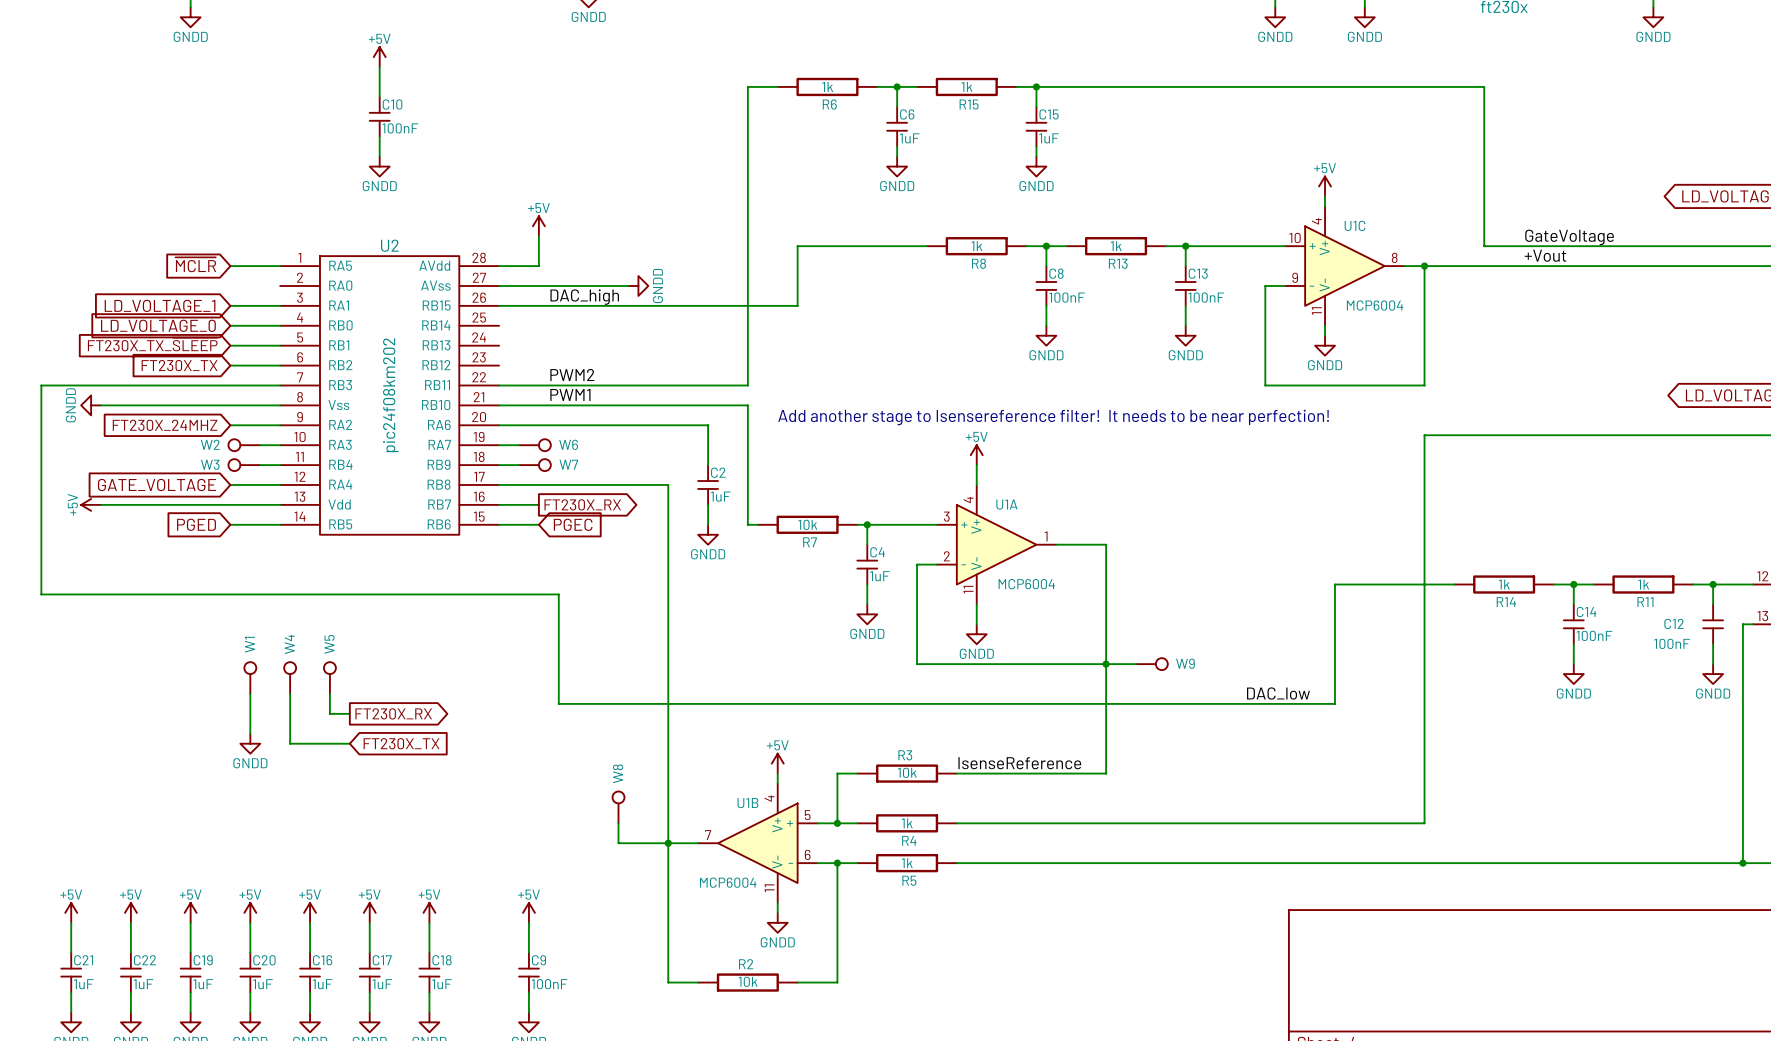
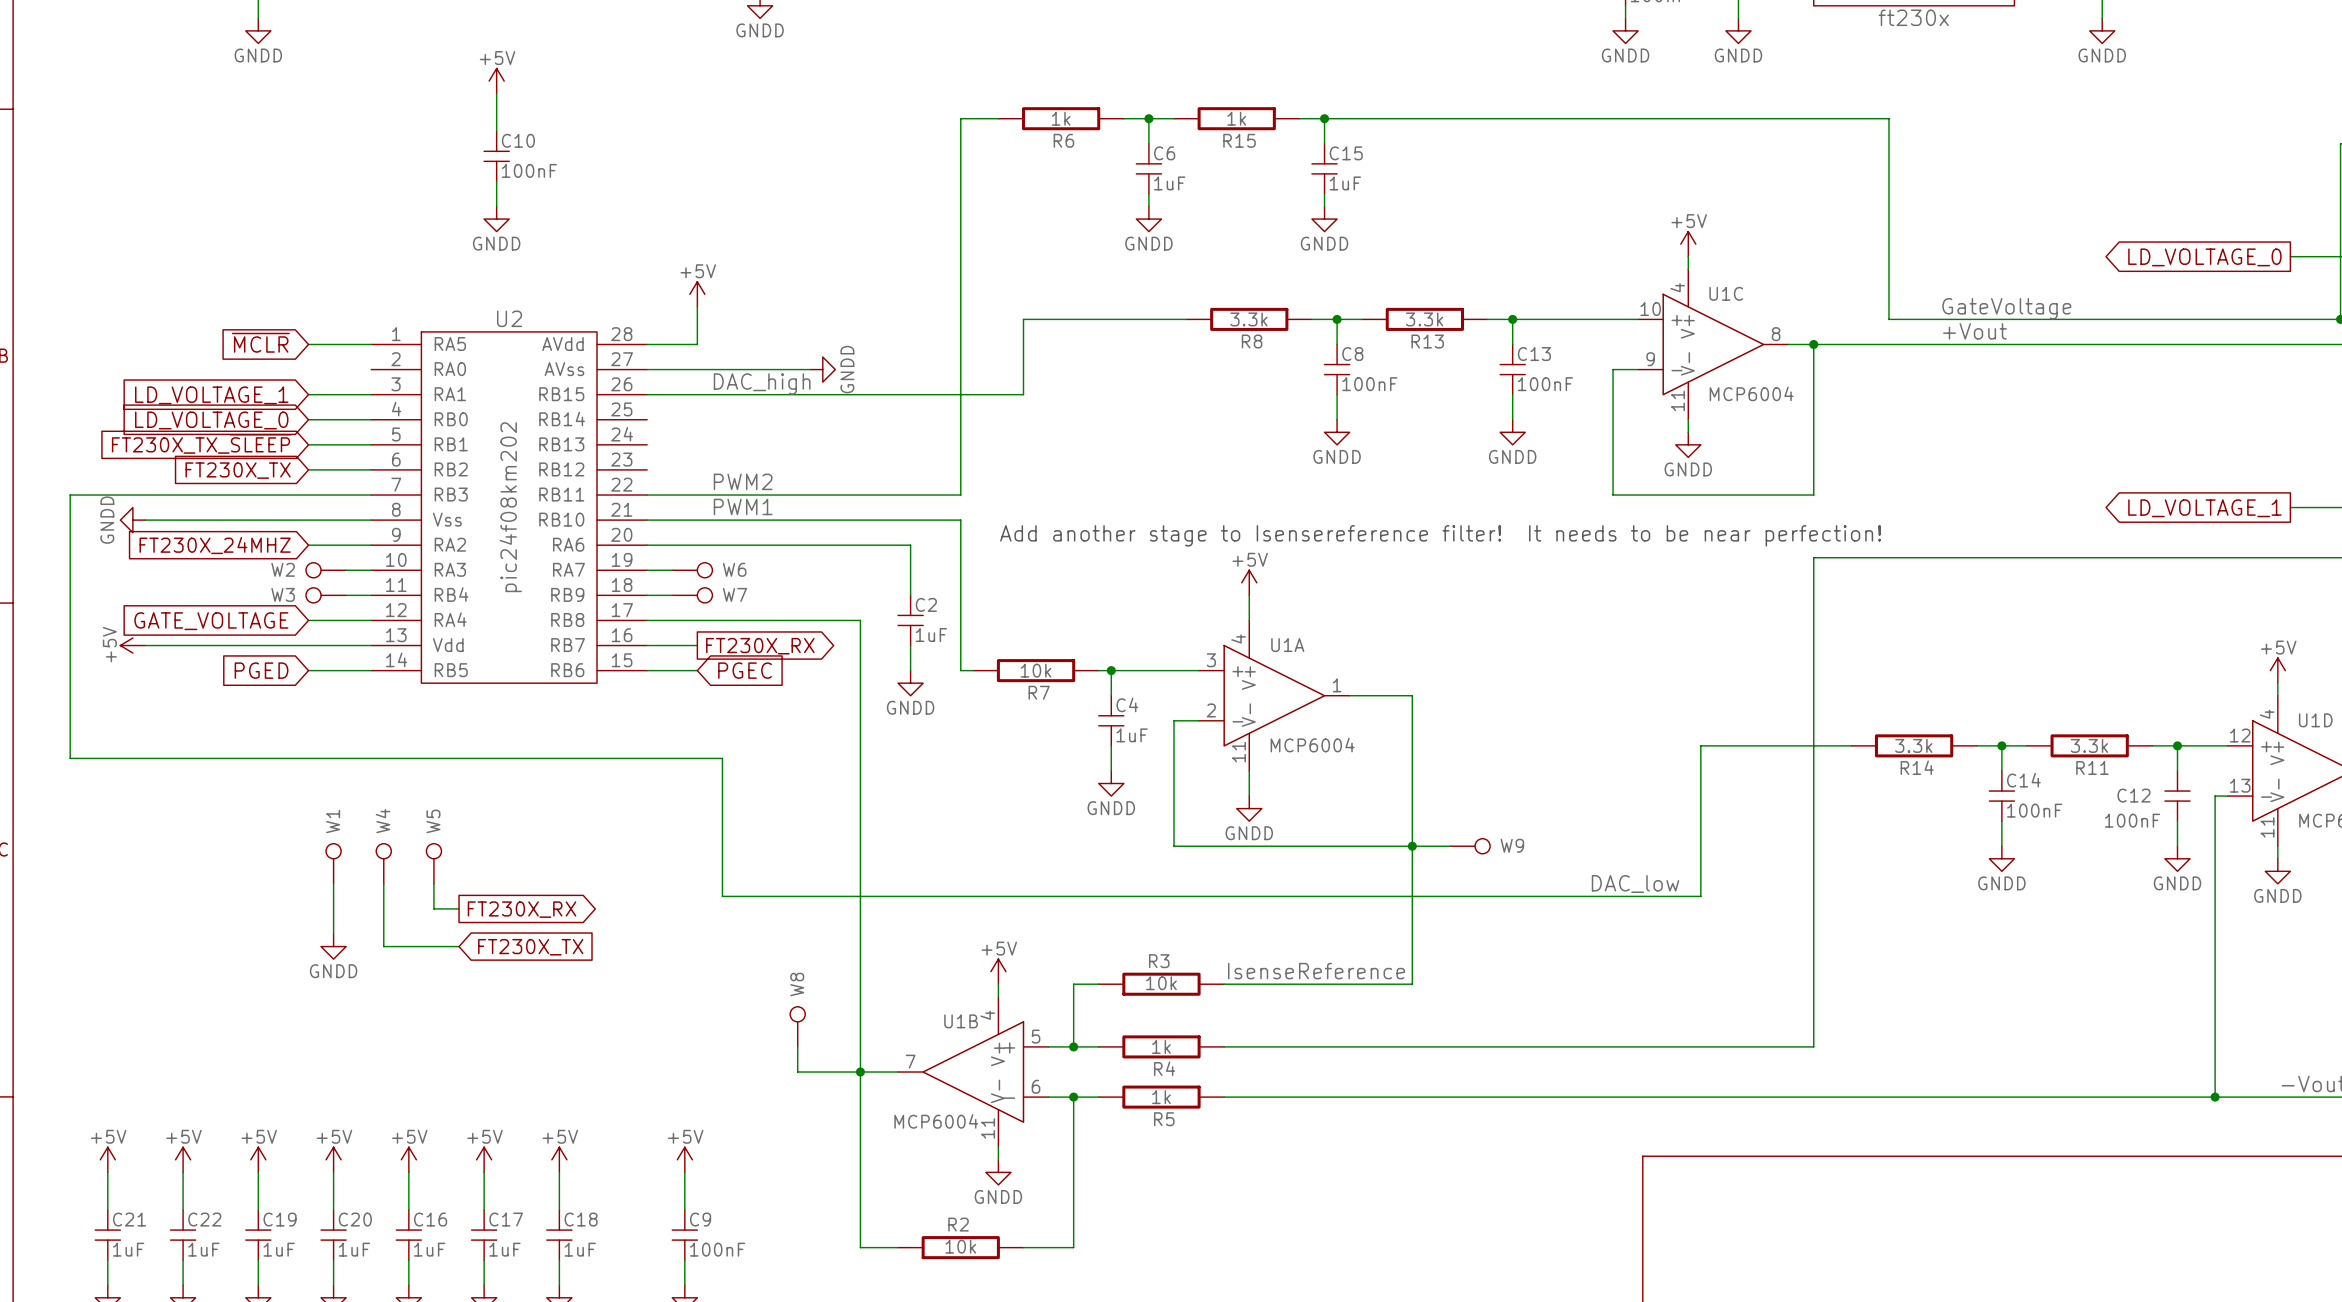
R8 value: 1k (976, 246) -> 3.3k (1248, 319)
R13 value: 1k (1116, 246) -> 3.3k (1424, 319)
R14 value: 1k (1504, 584) -> 3.3k (1913, 745)
R11 value: 1k (1643, 584) -> 3.3k (2089, 745)

